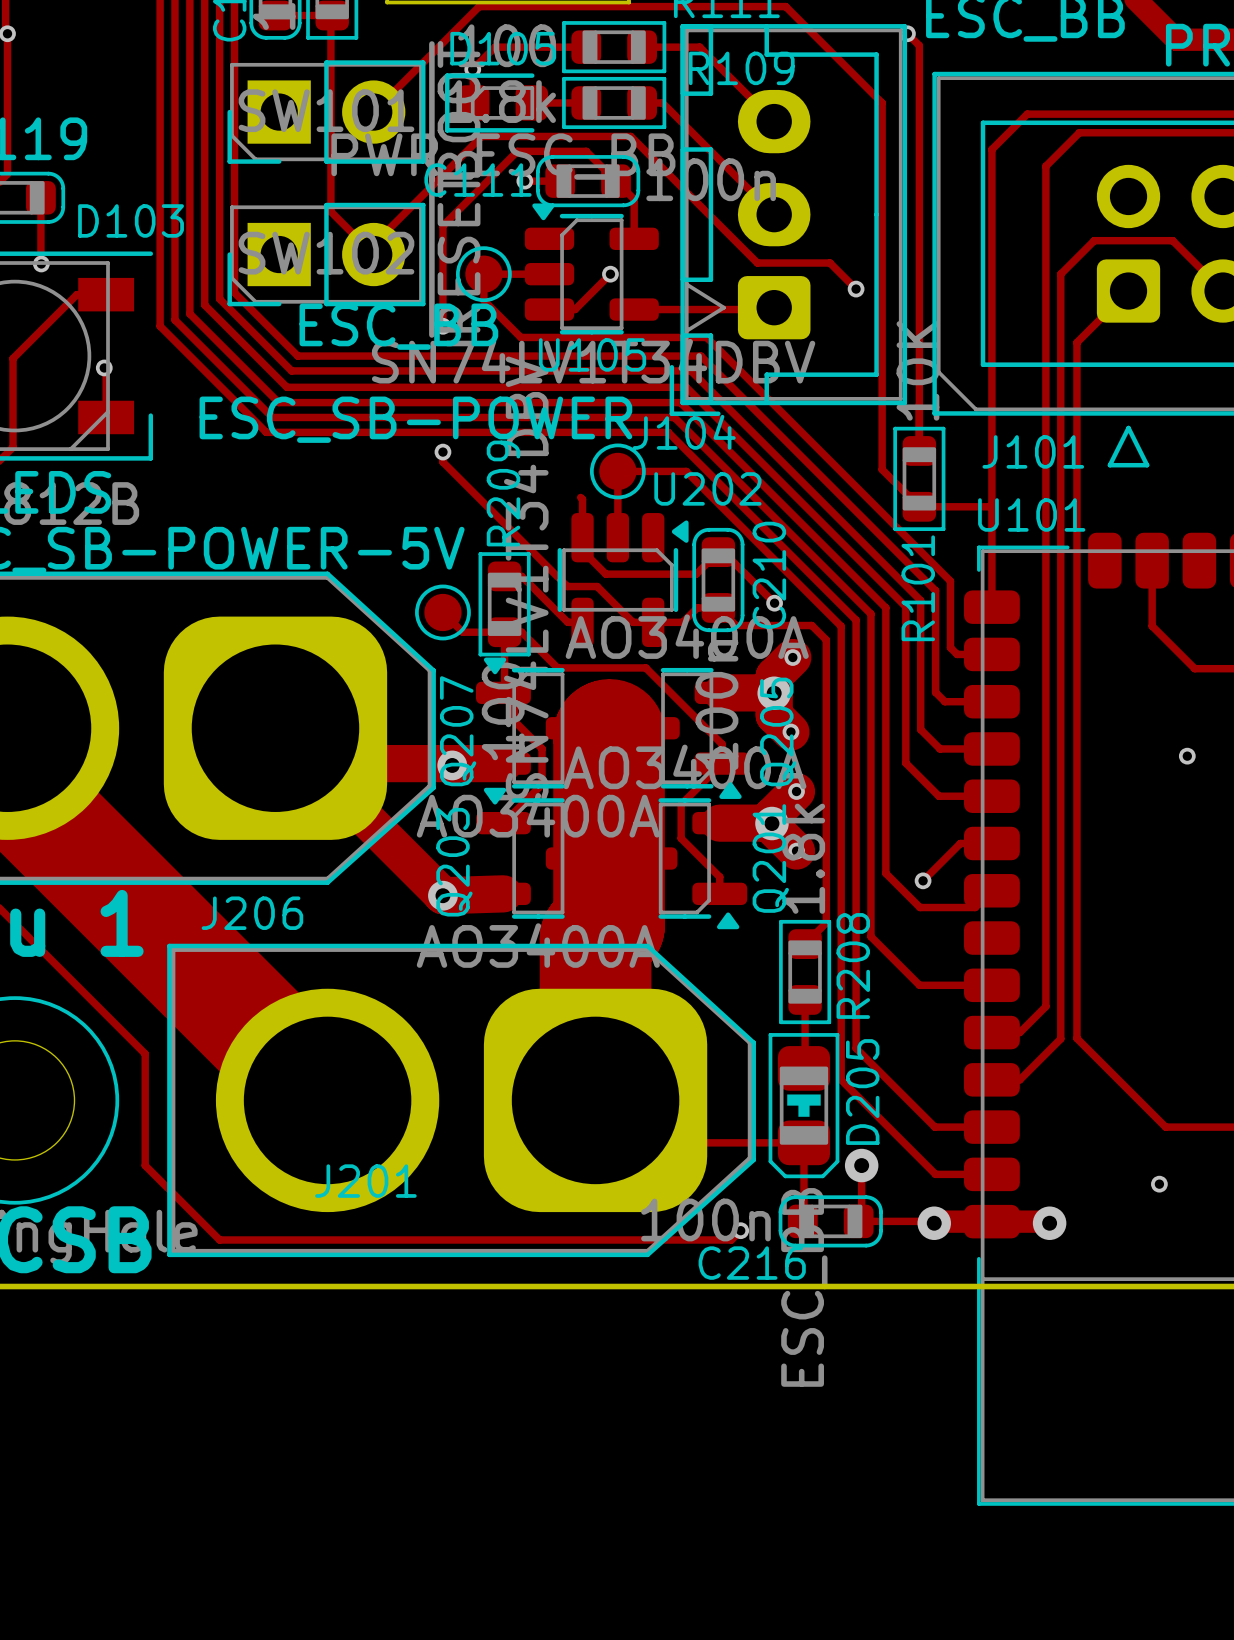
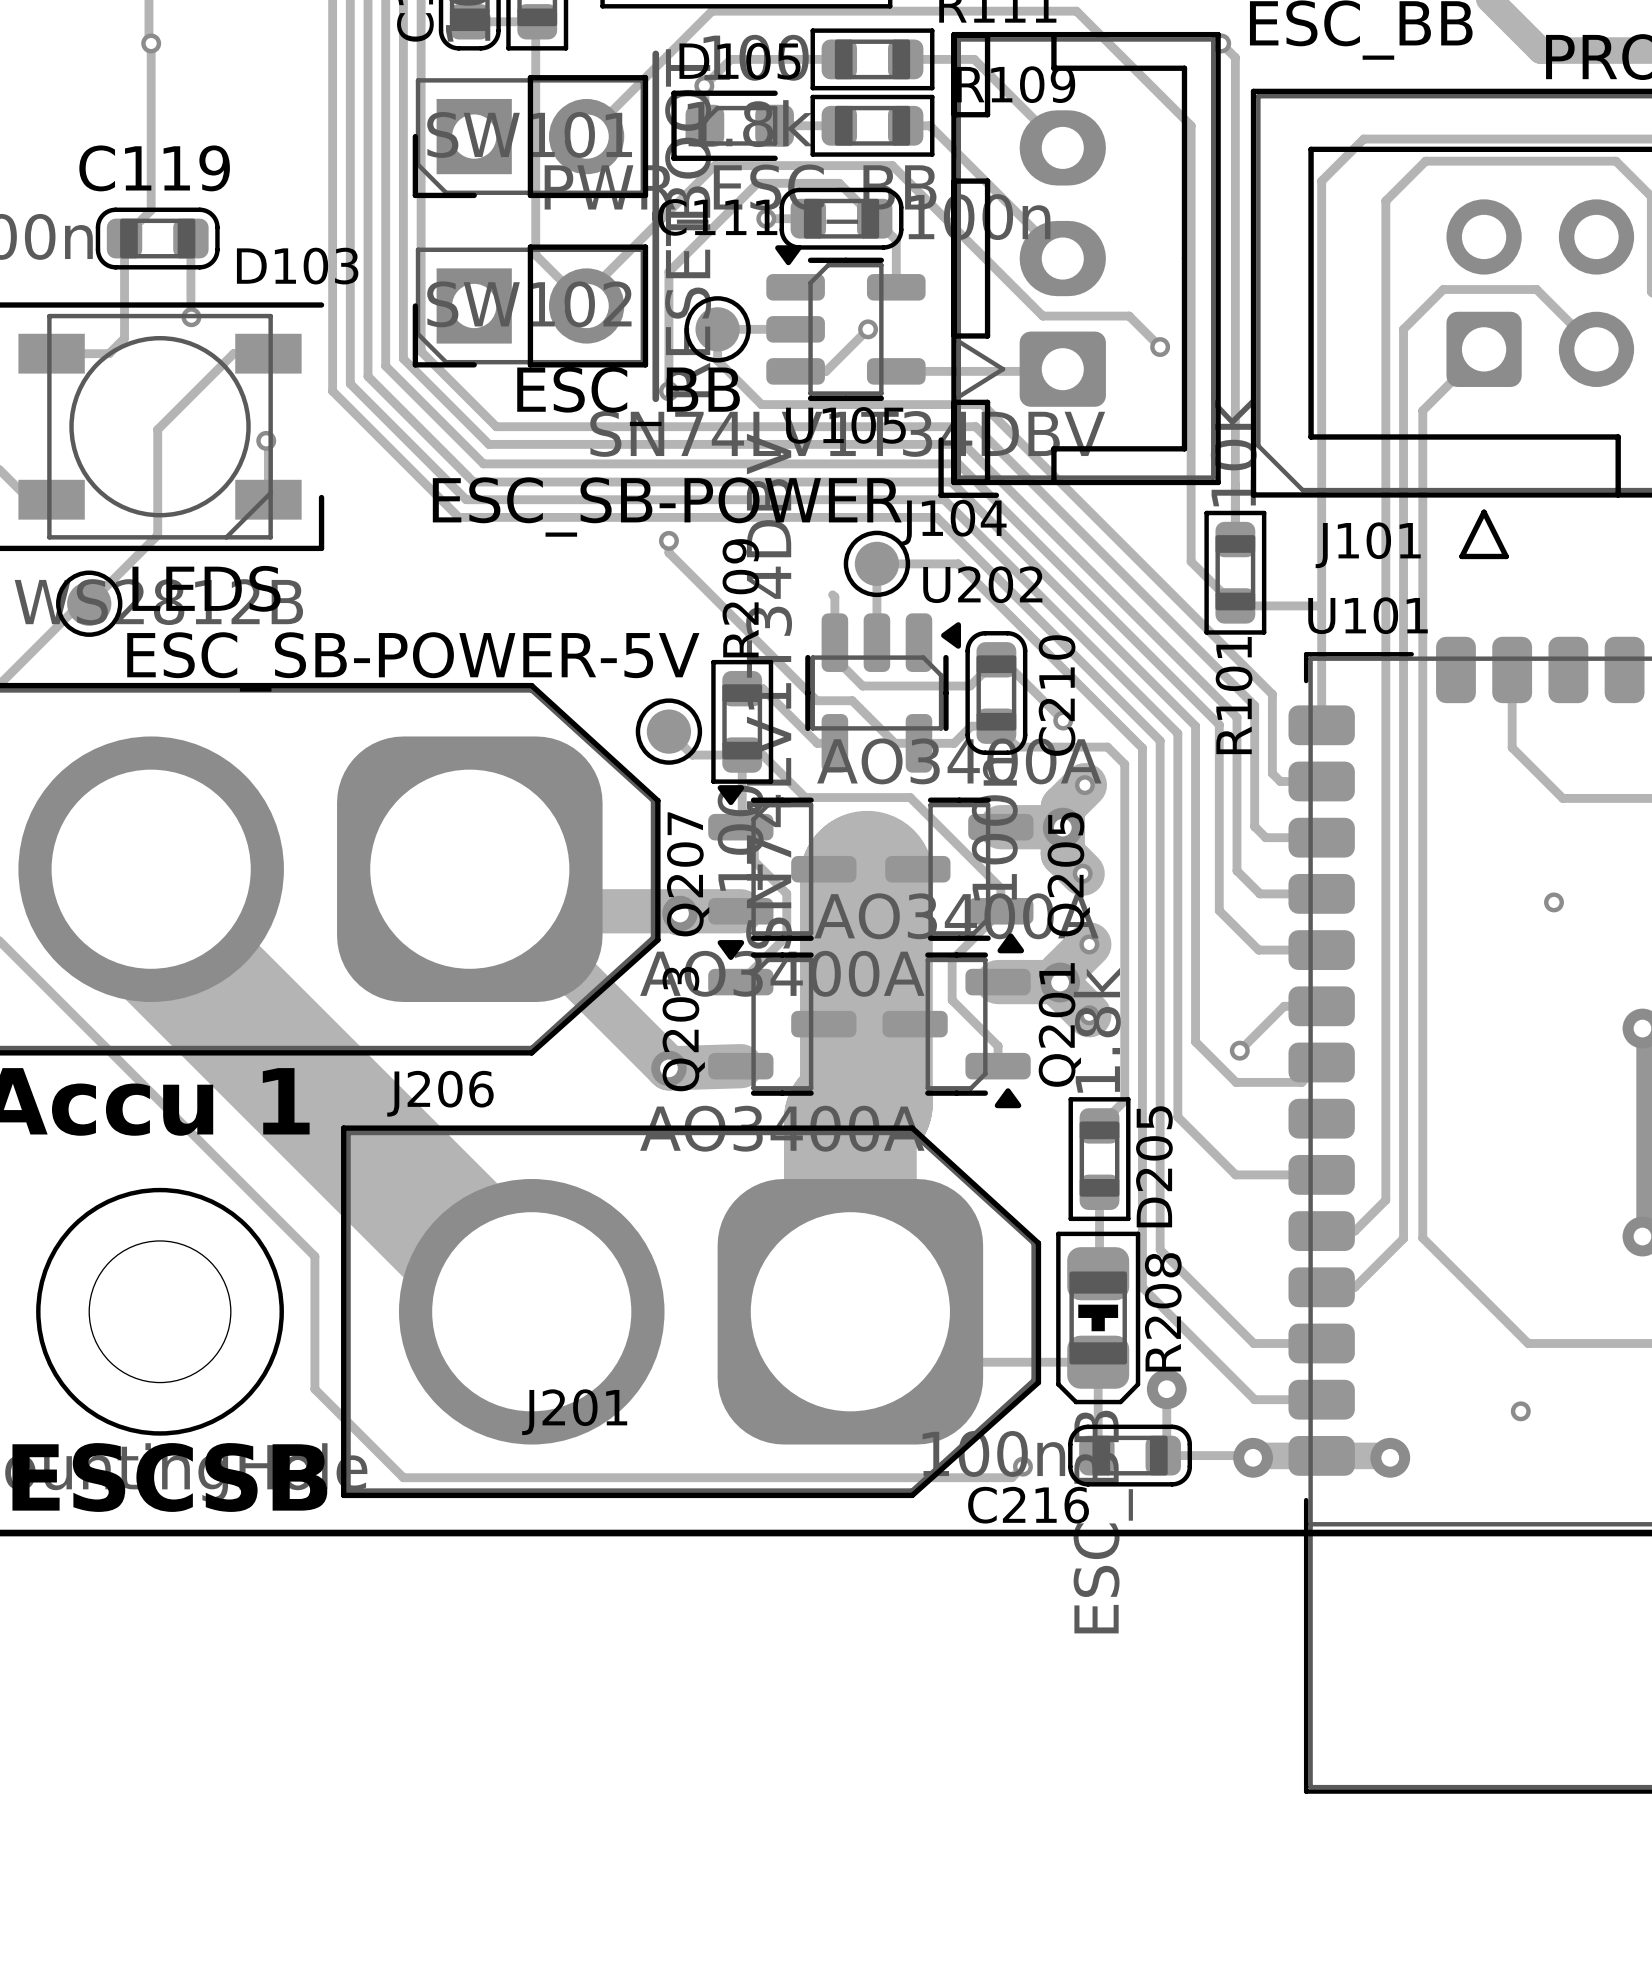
R208 name position: R208 (853, 965) -> R208 (1163, 1312)
D205 name position: D205 (862, 1092) -> D205 (1154, 1166)

